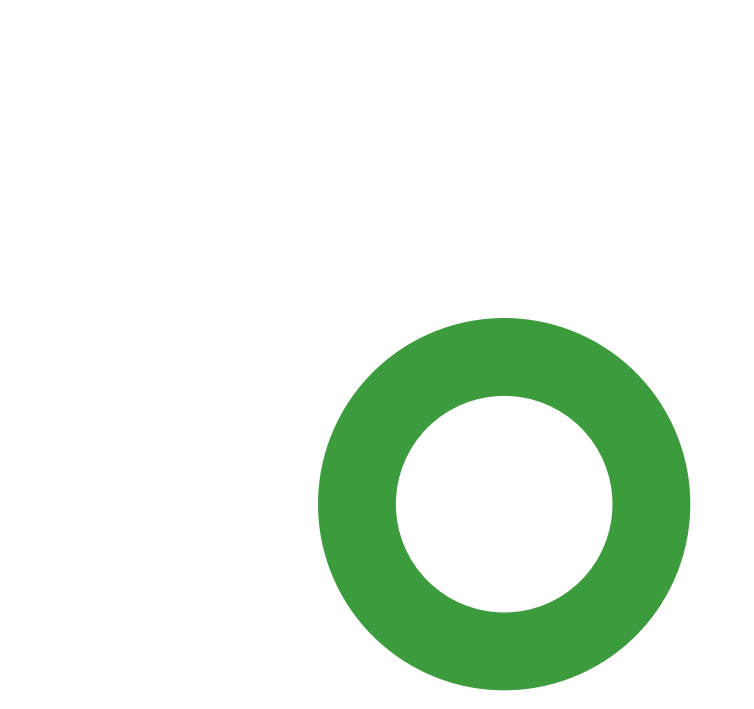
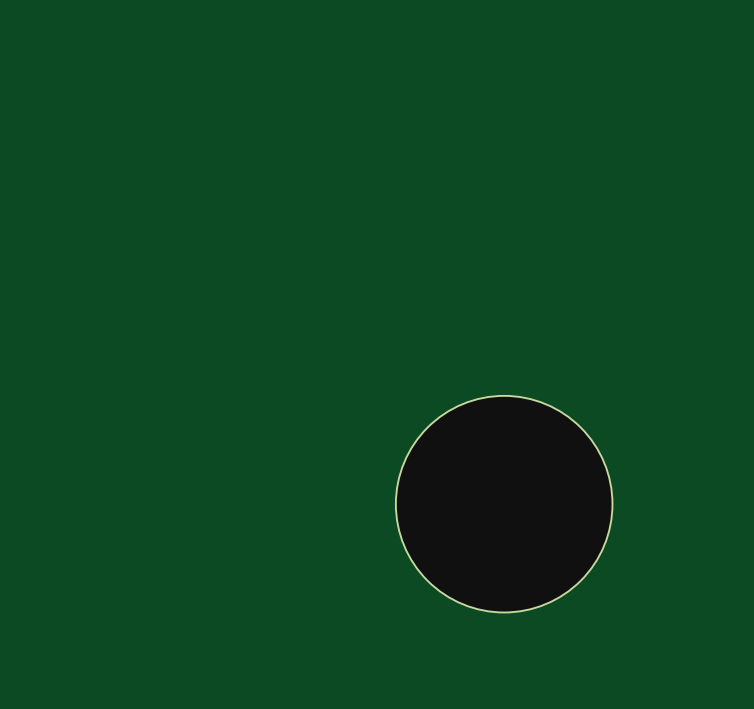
part footprint: [318, 318, 691, 691] -> [395, 395, 613, 613]

